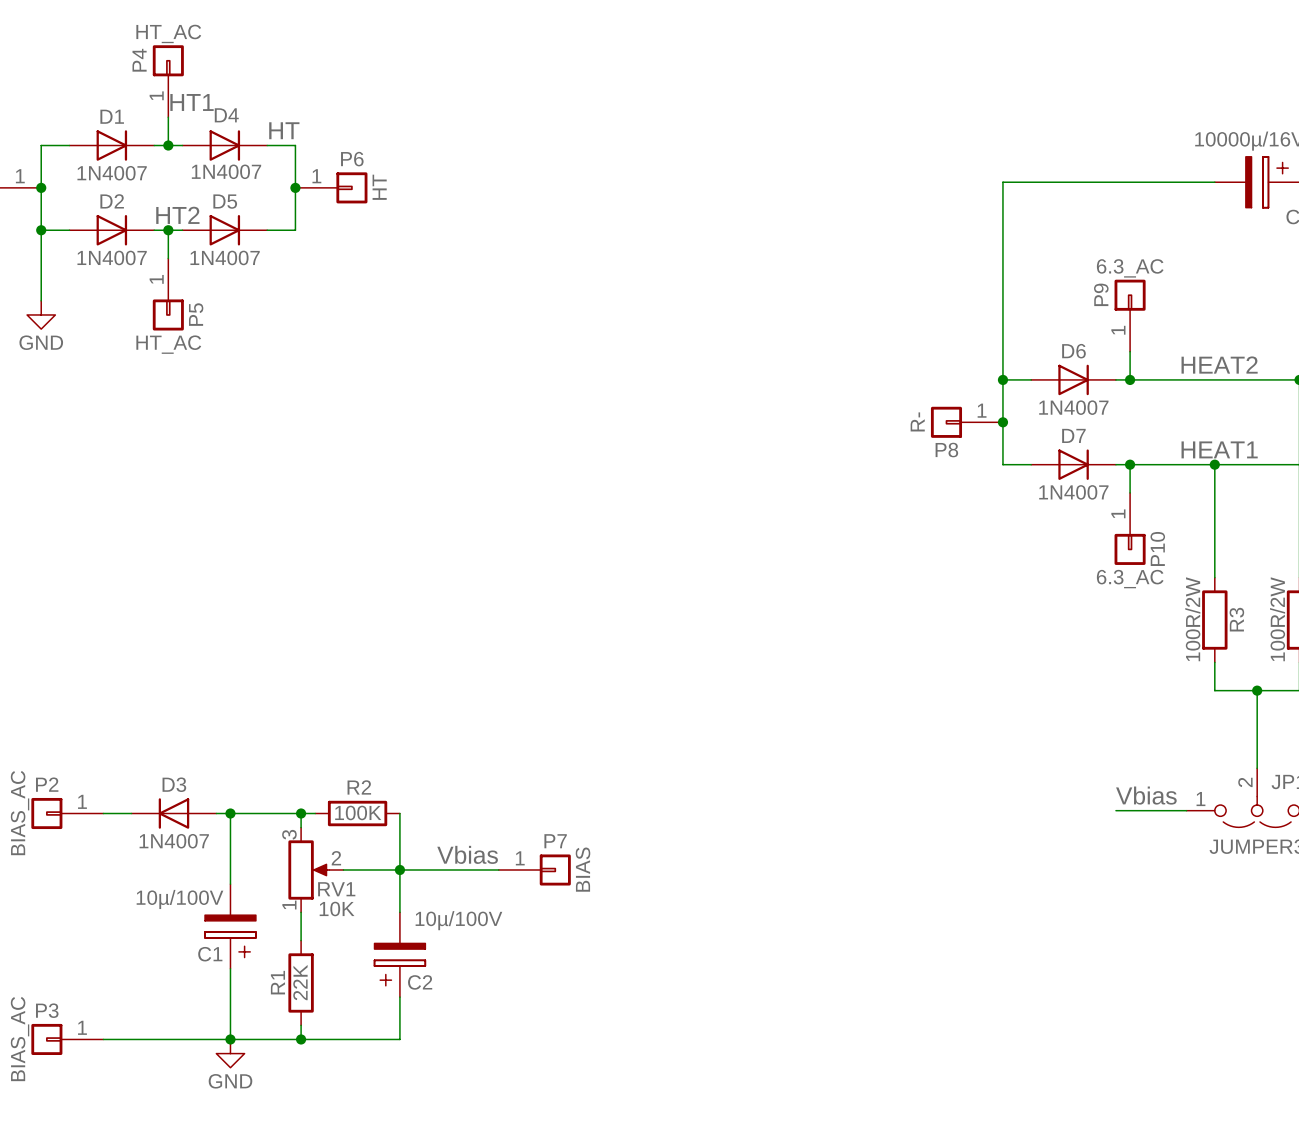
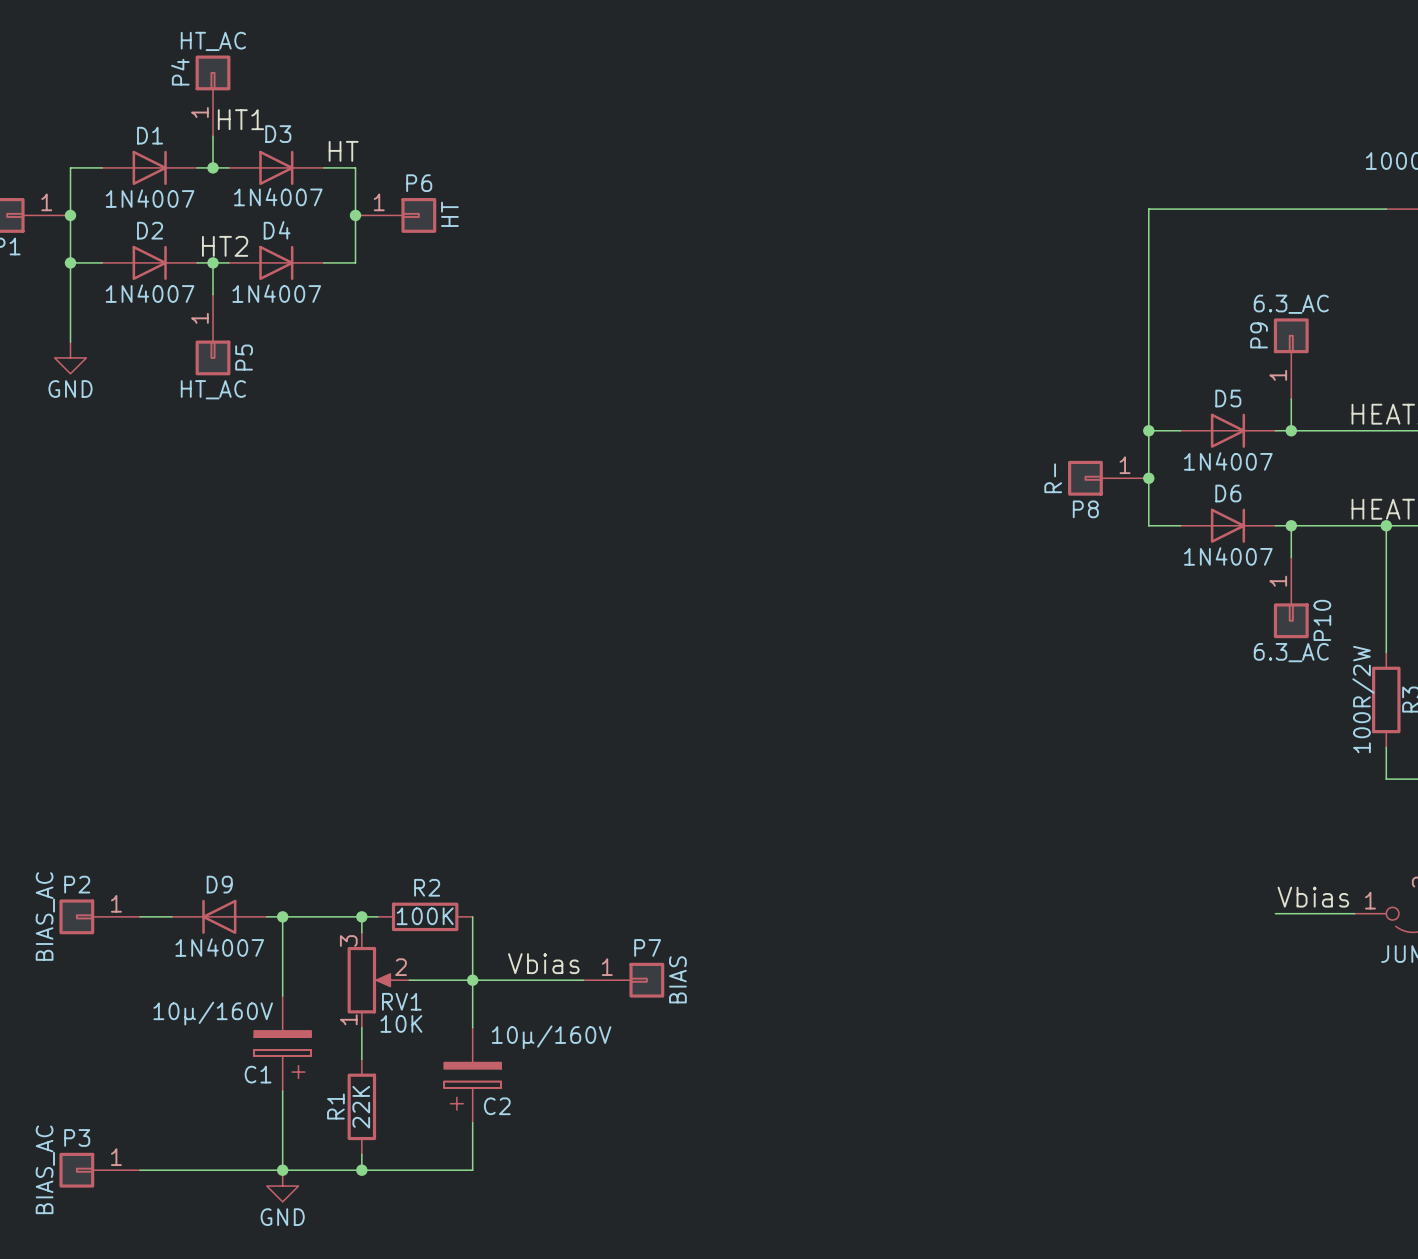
D4 name: D4 (226, 115) -> D3 (278, 134)
D5 name: D5 (225, 201) -> D4 (277, 230)
D6 name: D6 (1073, 351) -> D5 (1228, 398)
D7 name: D7 (1073, 435) -> D6 (1228, 493)
D3 name: D3 (174, 784) -> D9 (219, 884)
C1 value: 10µ/100V (179, 899) -> 10µ/160V (213, 1013)
C2 value: 10µ/100V (458, 920) -> 10µ/160V (551, 1037)

